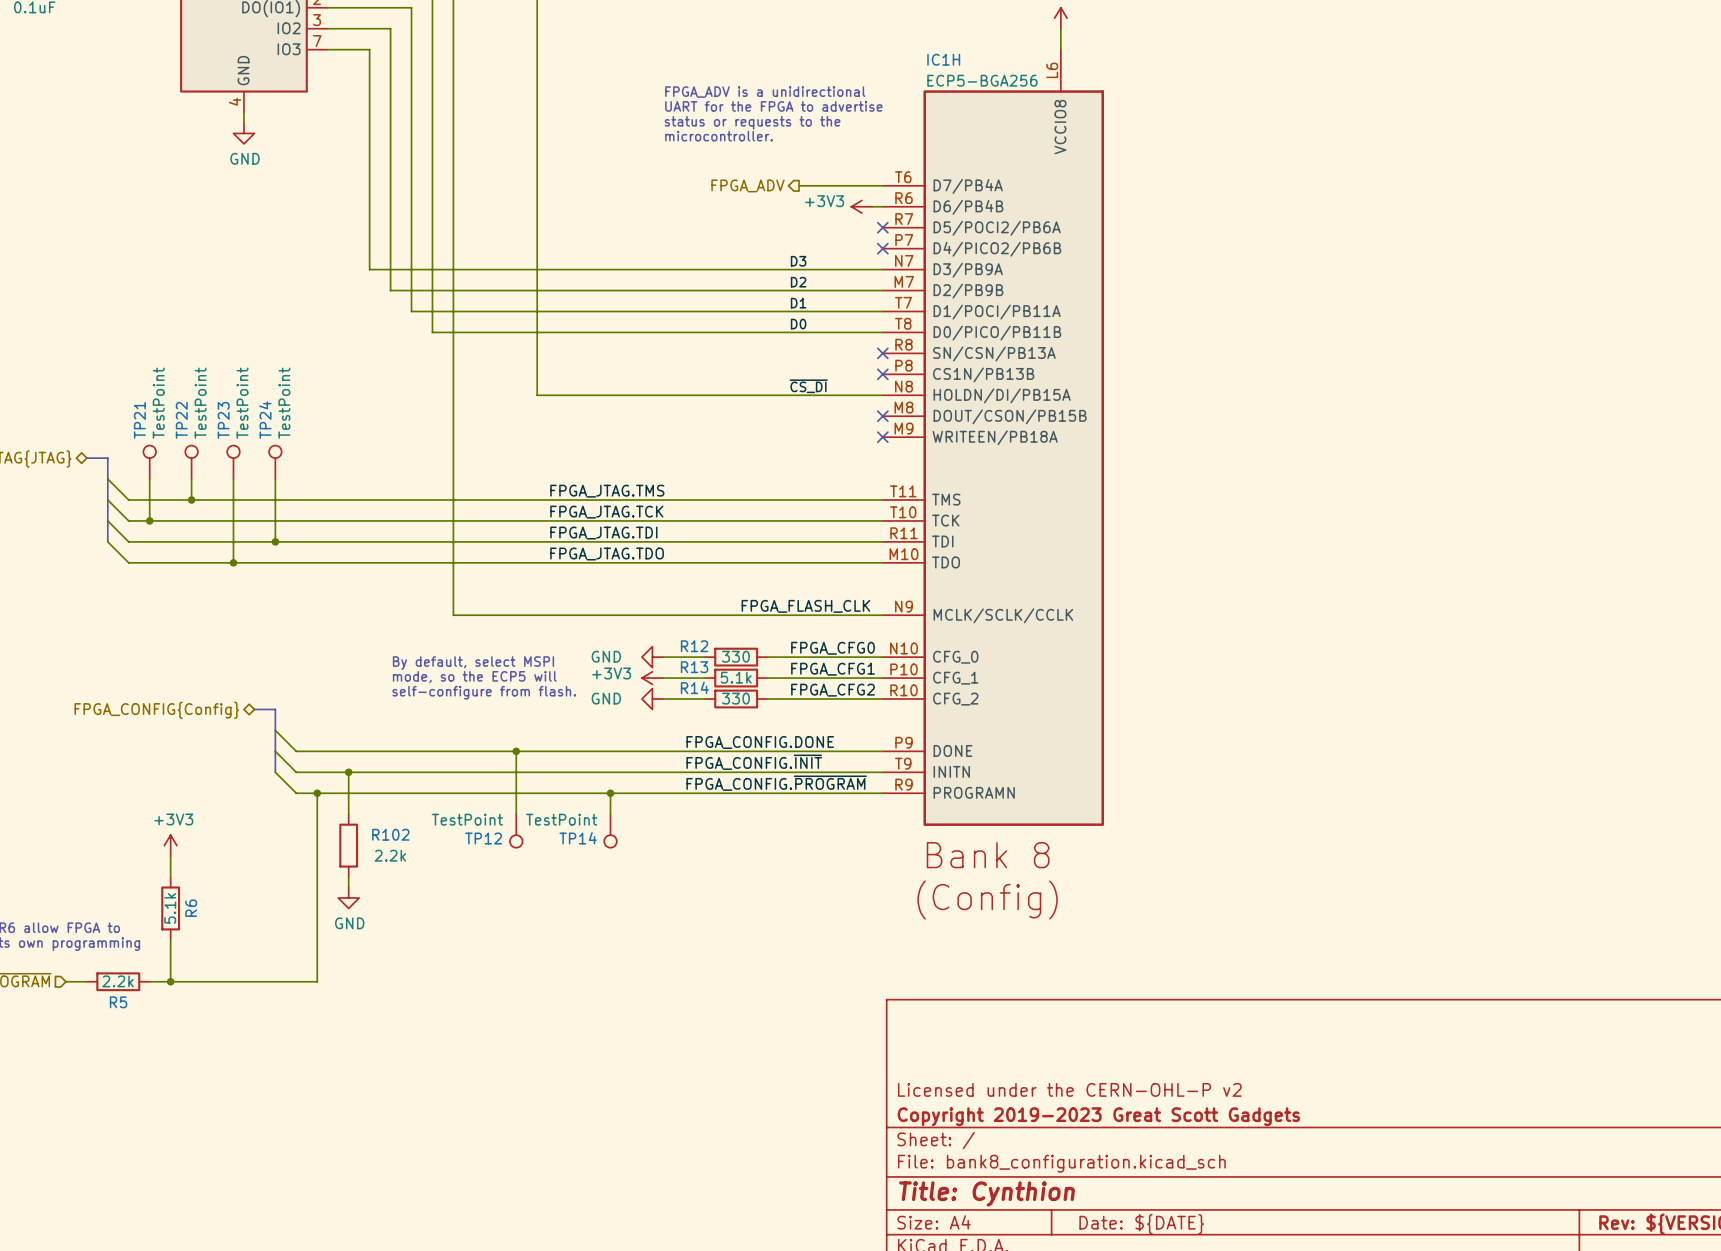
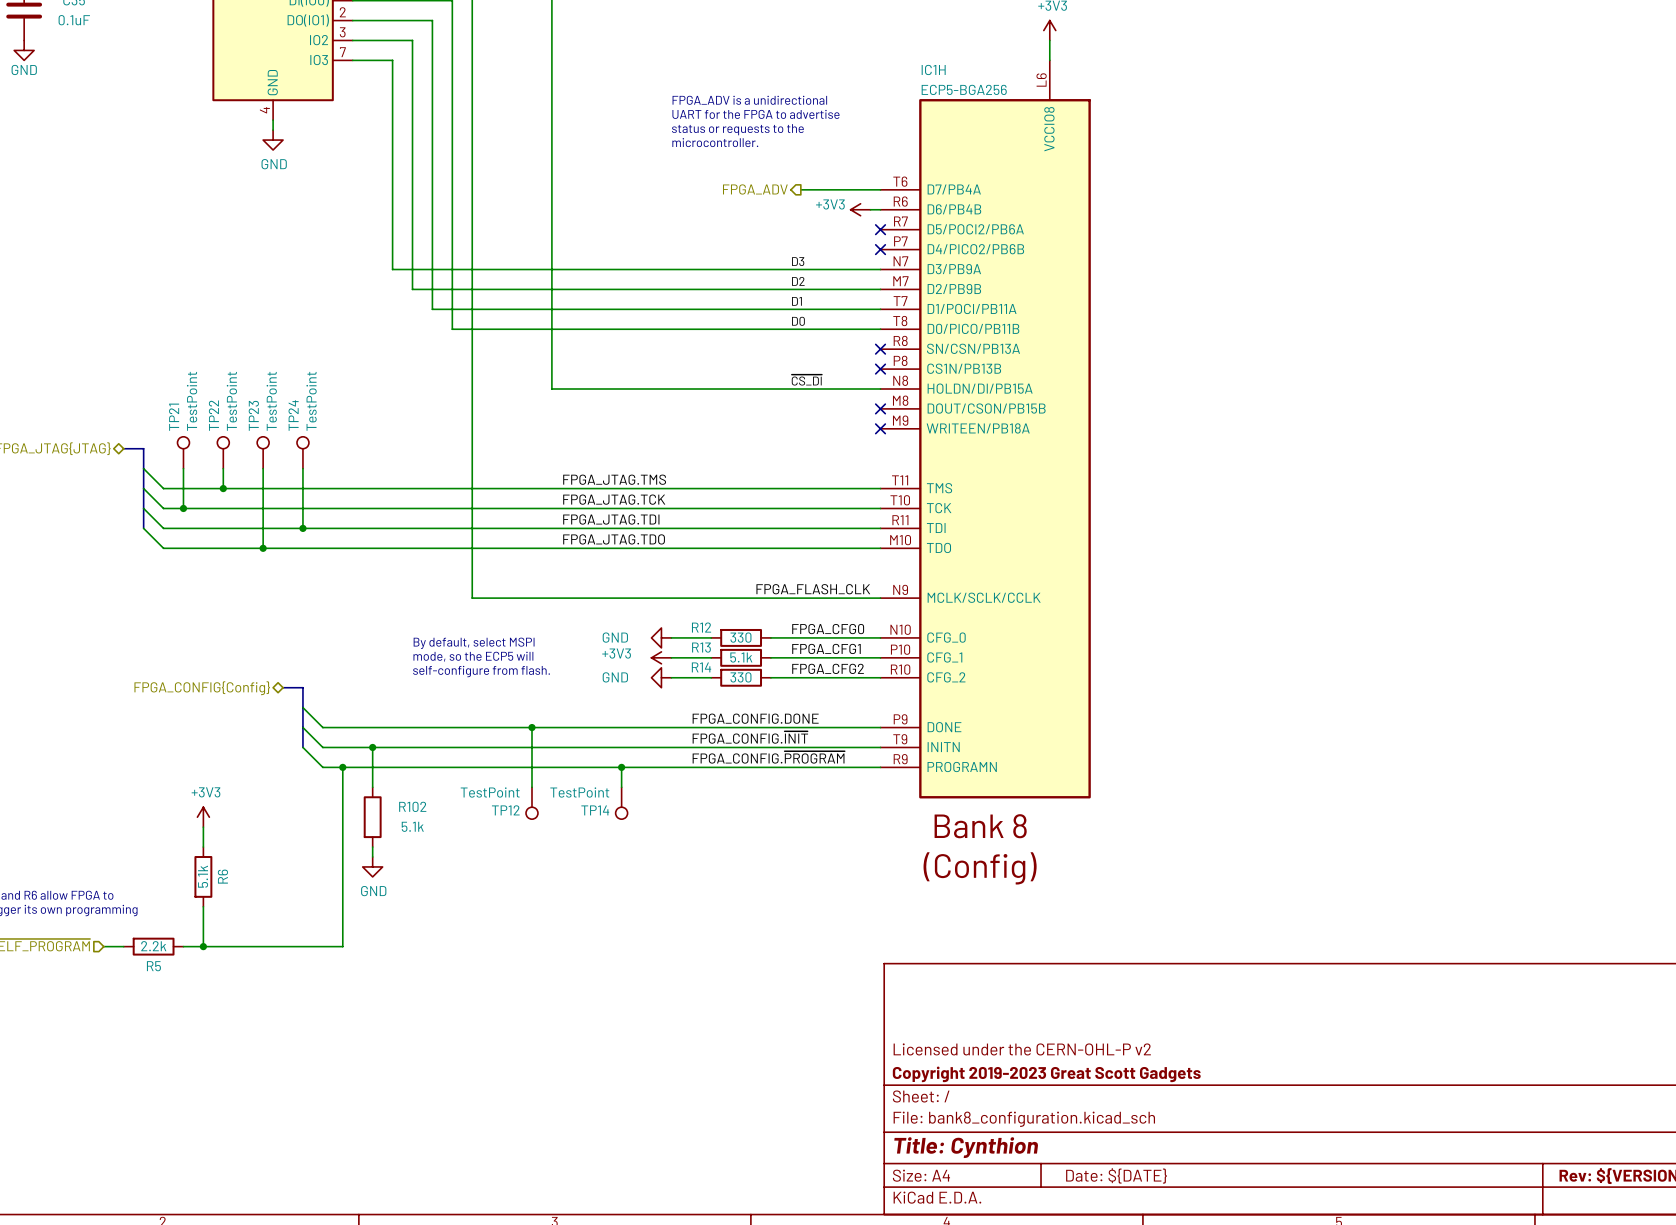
R102 value: 2.2k (390, 855) -> 5.1k (412, 826)

